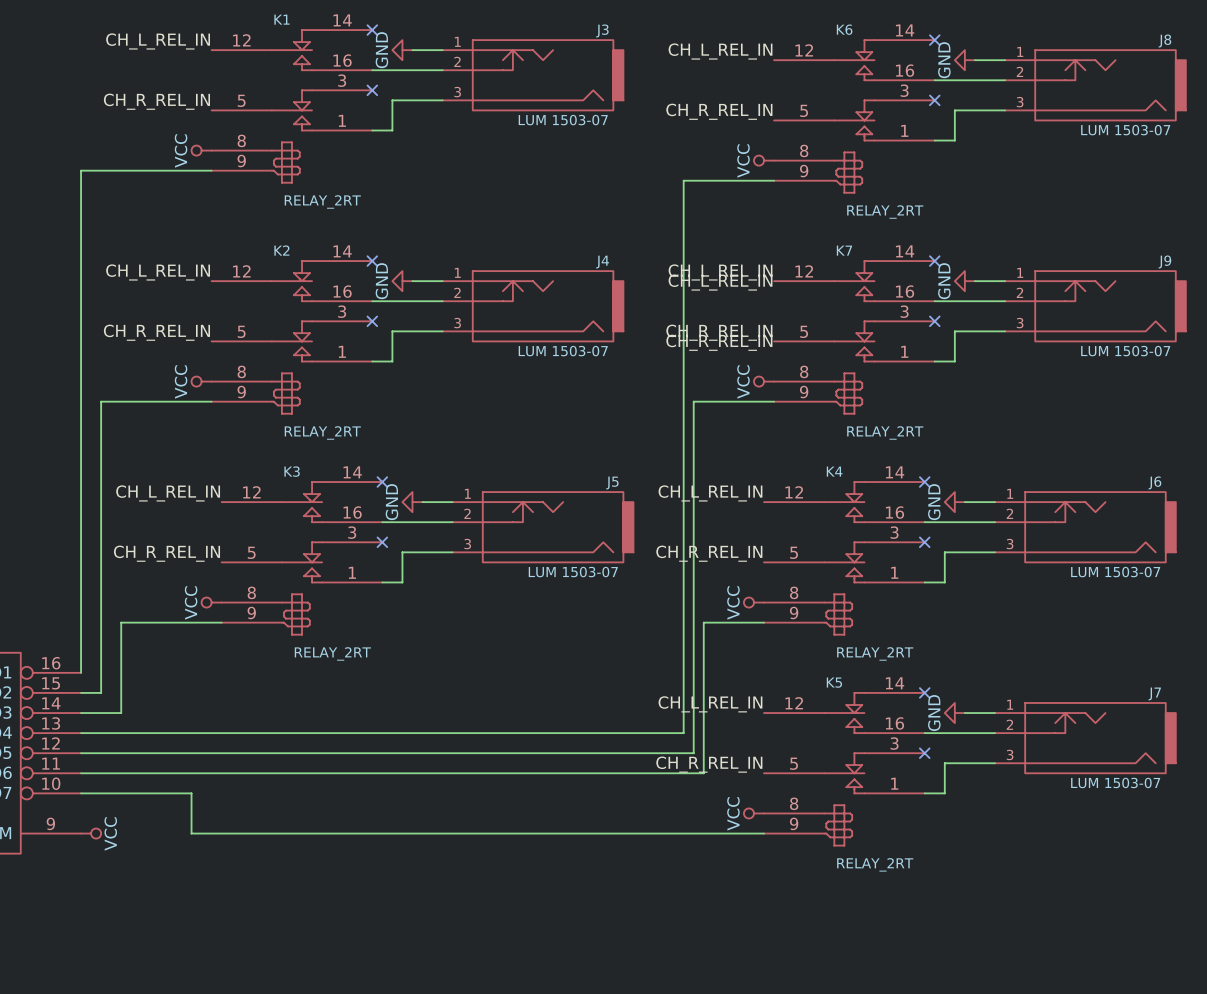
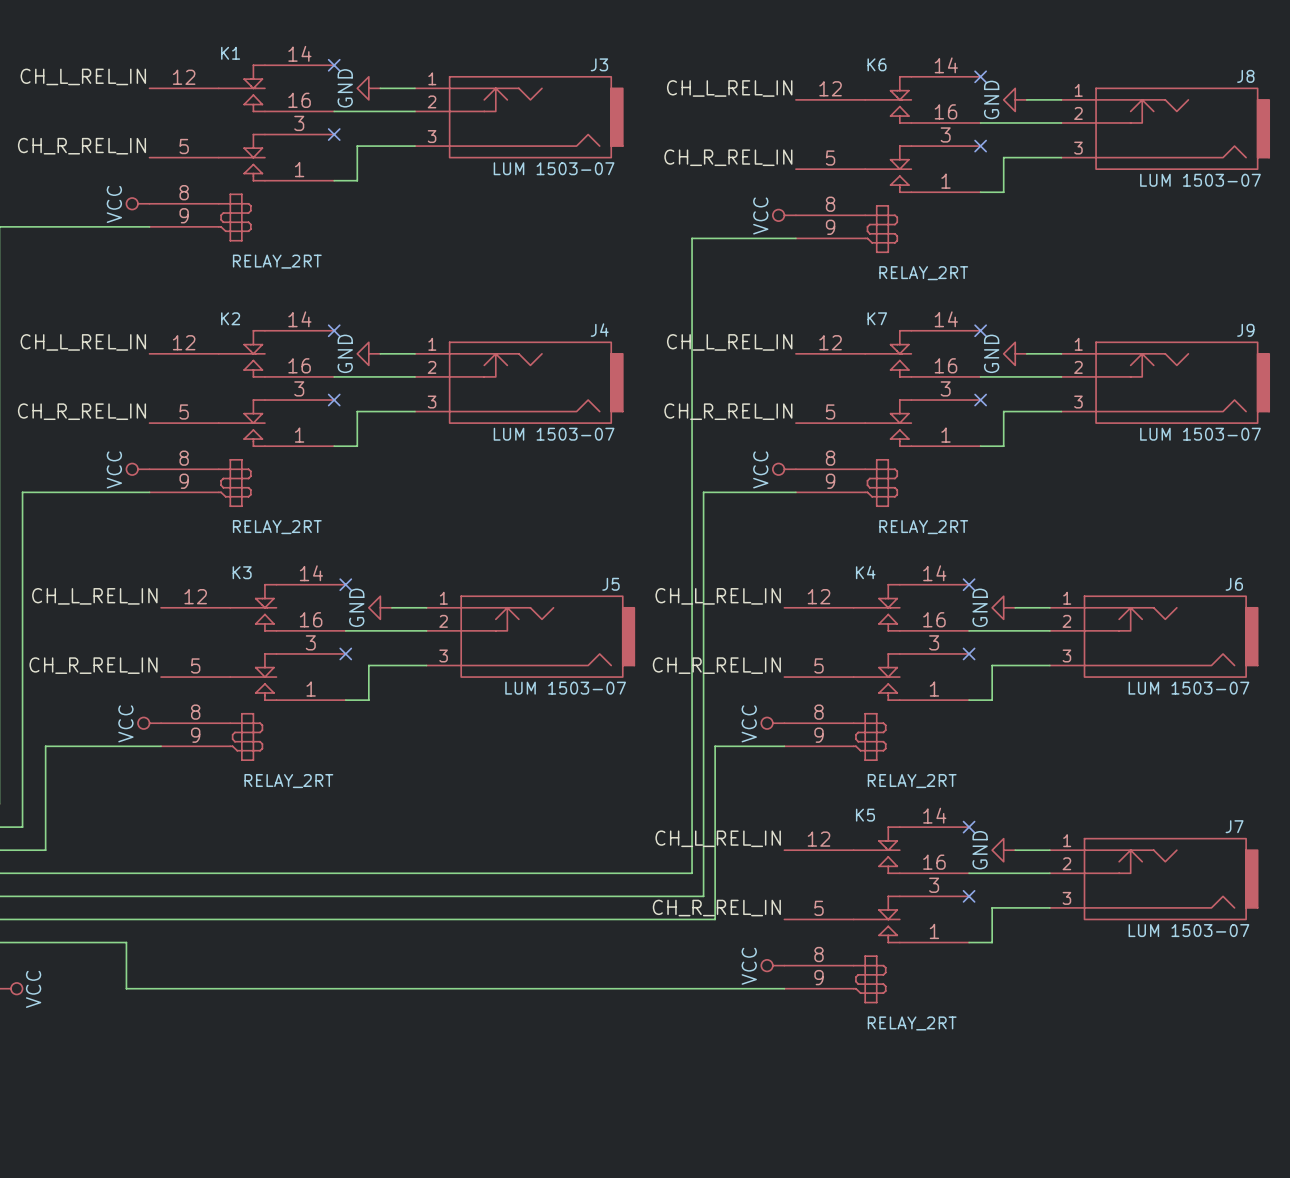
label: CH_L_REL_IN (720, 282) -> none
label: CH_R_REL_IN (719, 342) -> none

